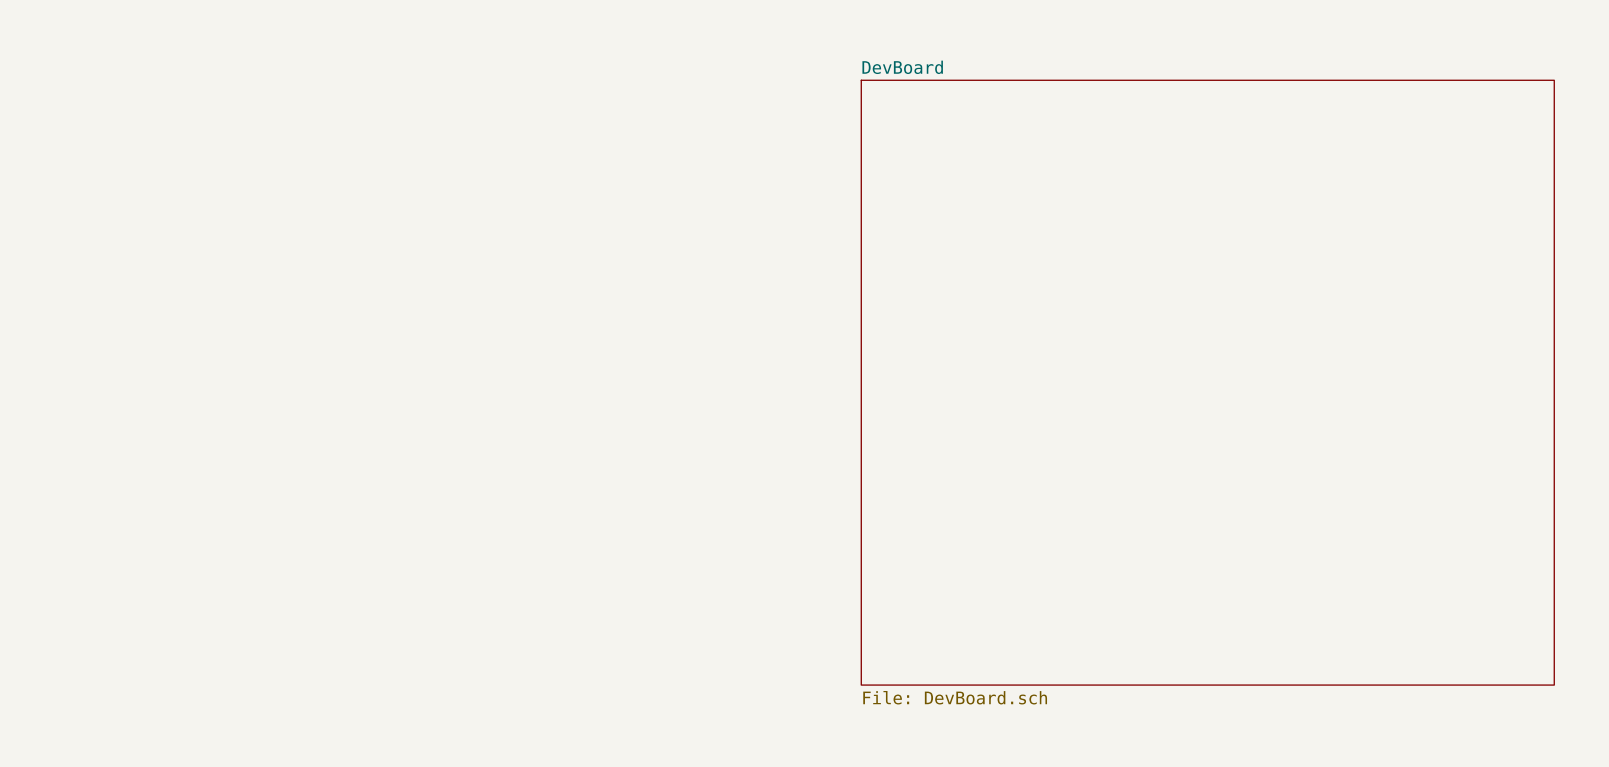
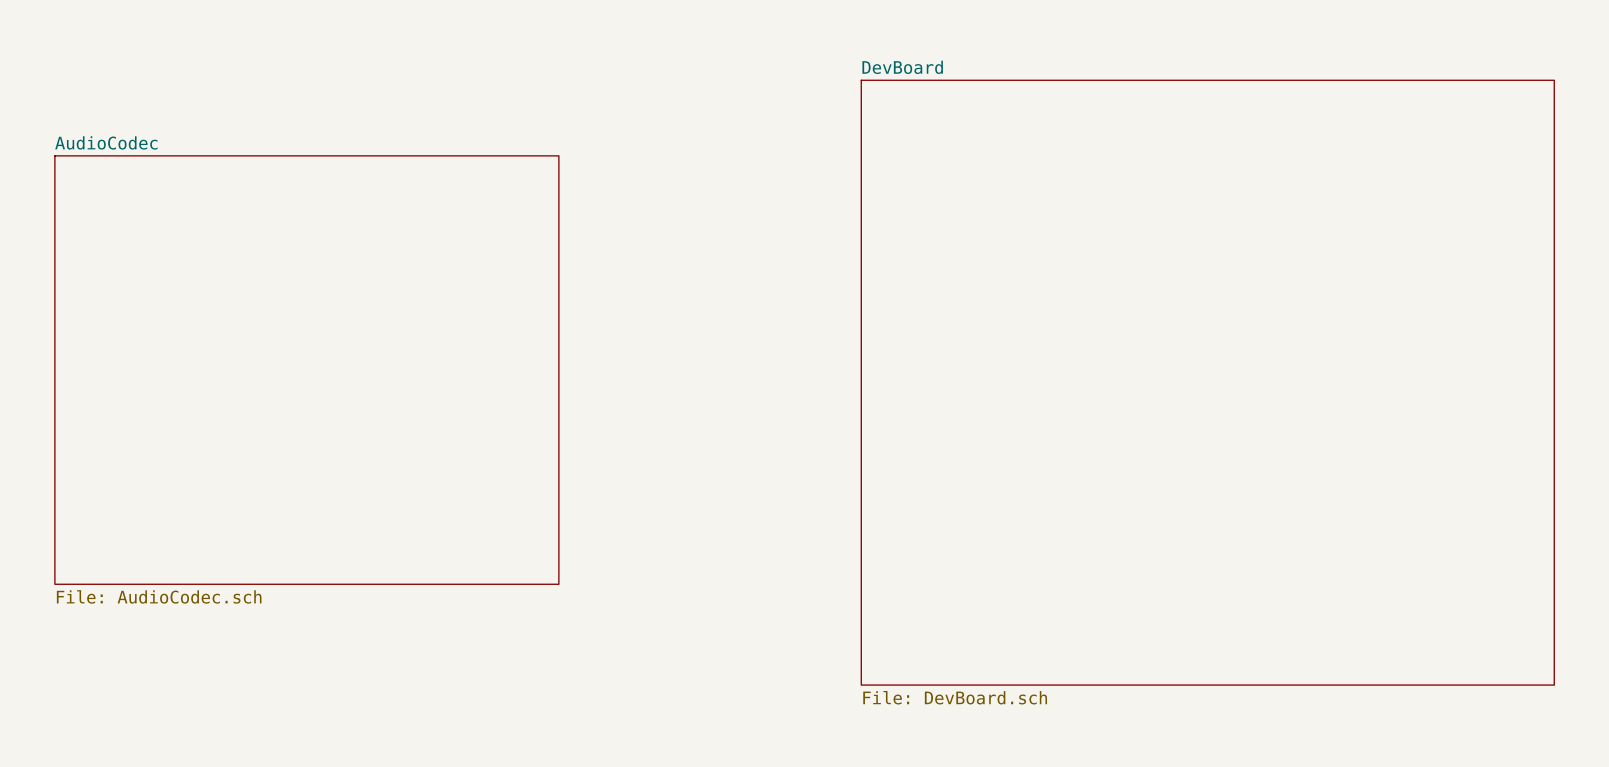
sheet AudioCodec: none -> File: AudioCodec.sch (306, 370)

